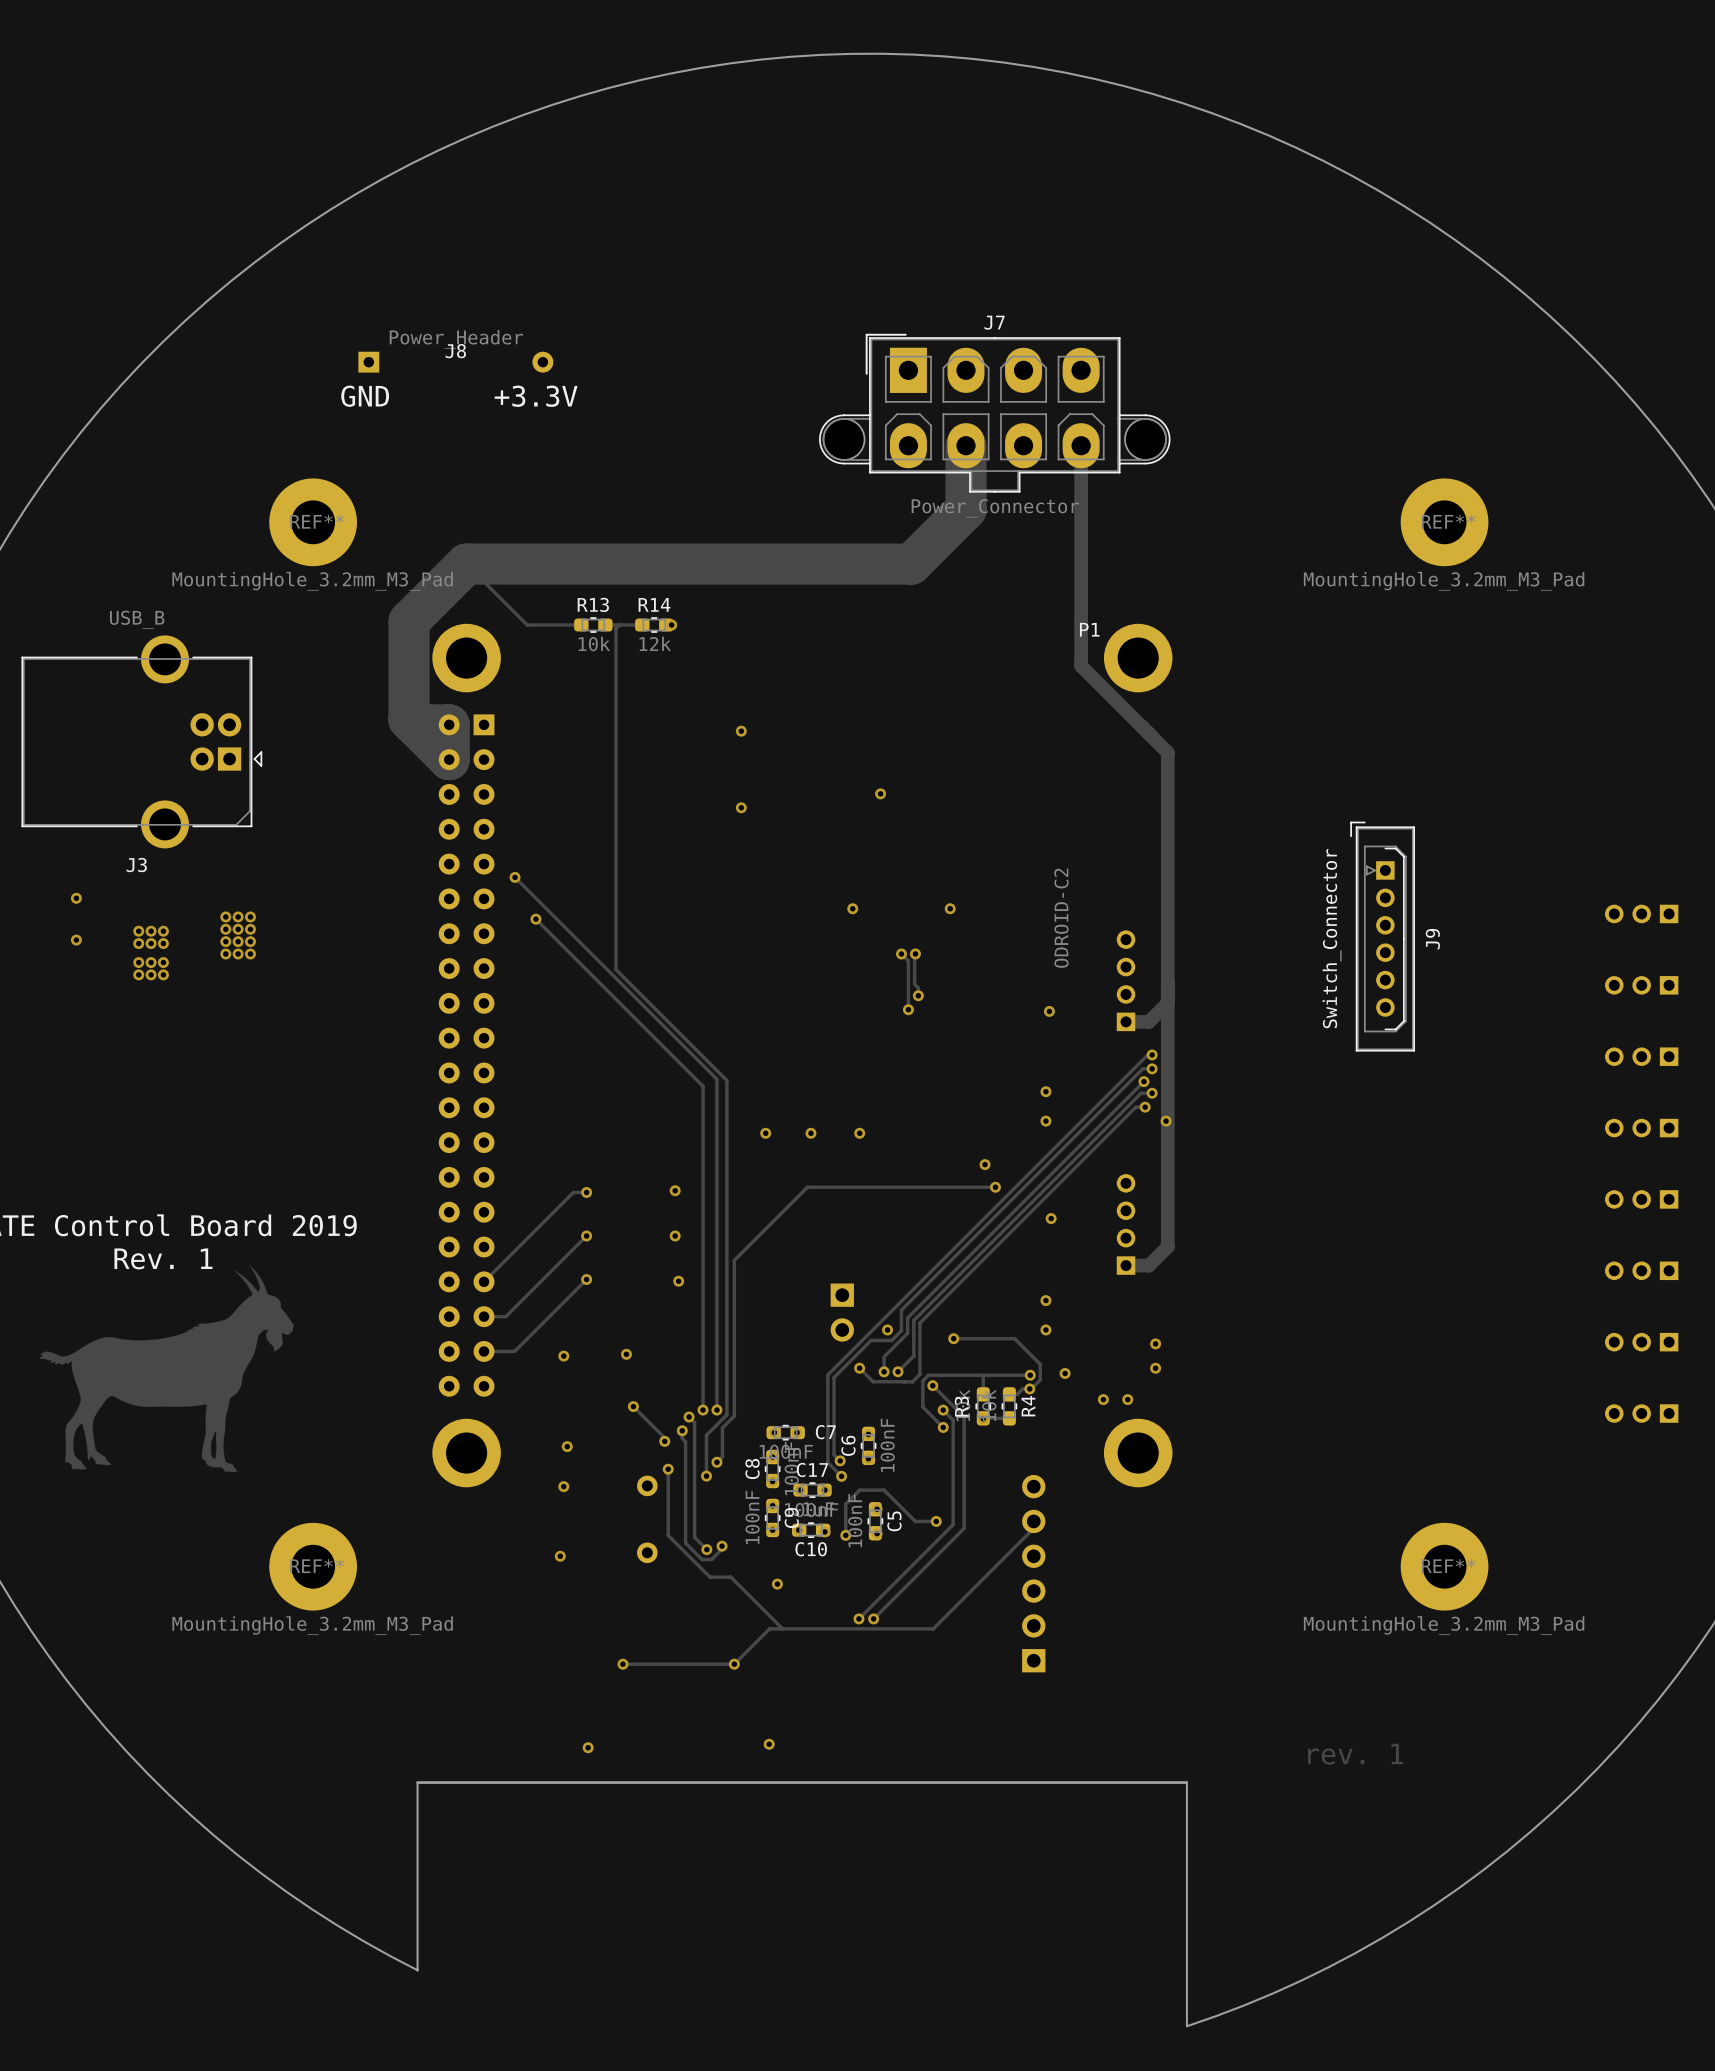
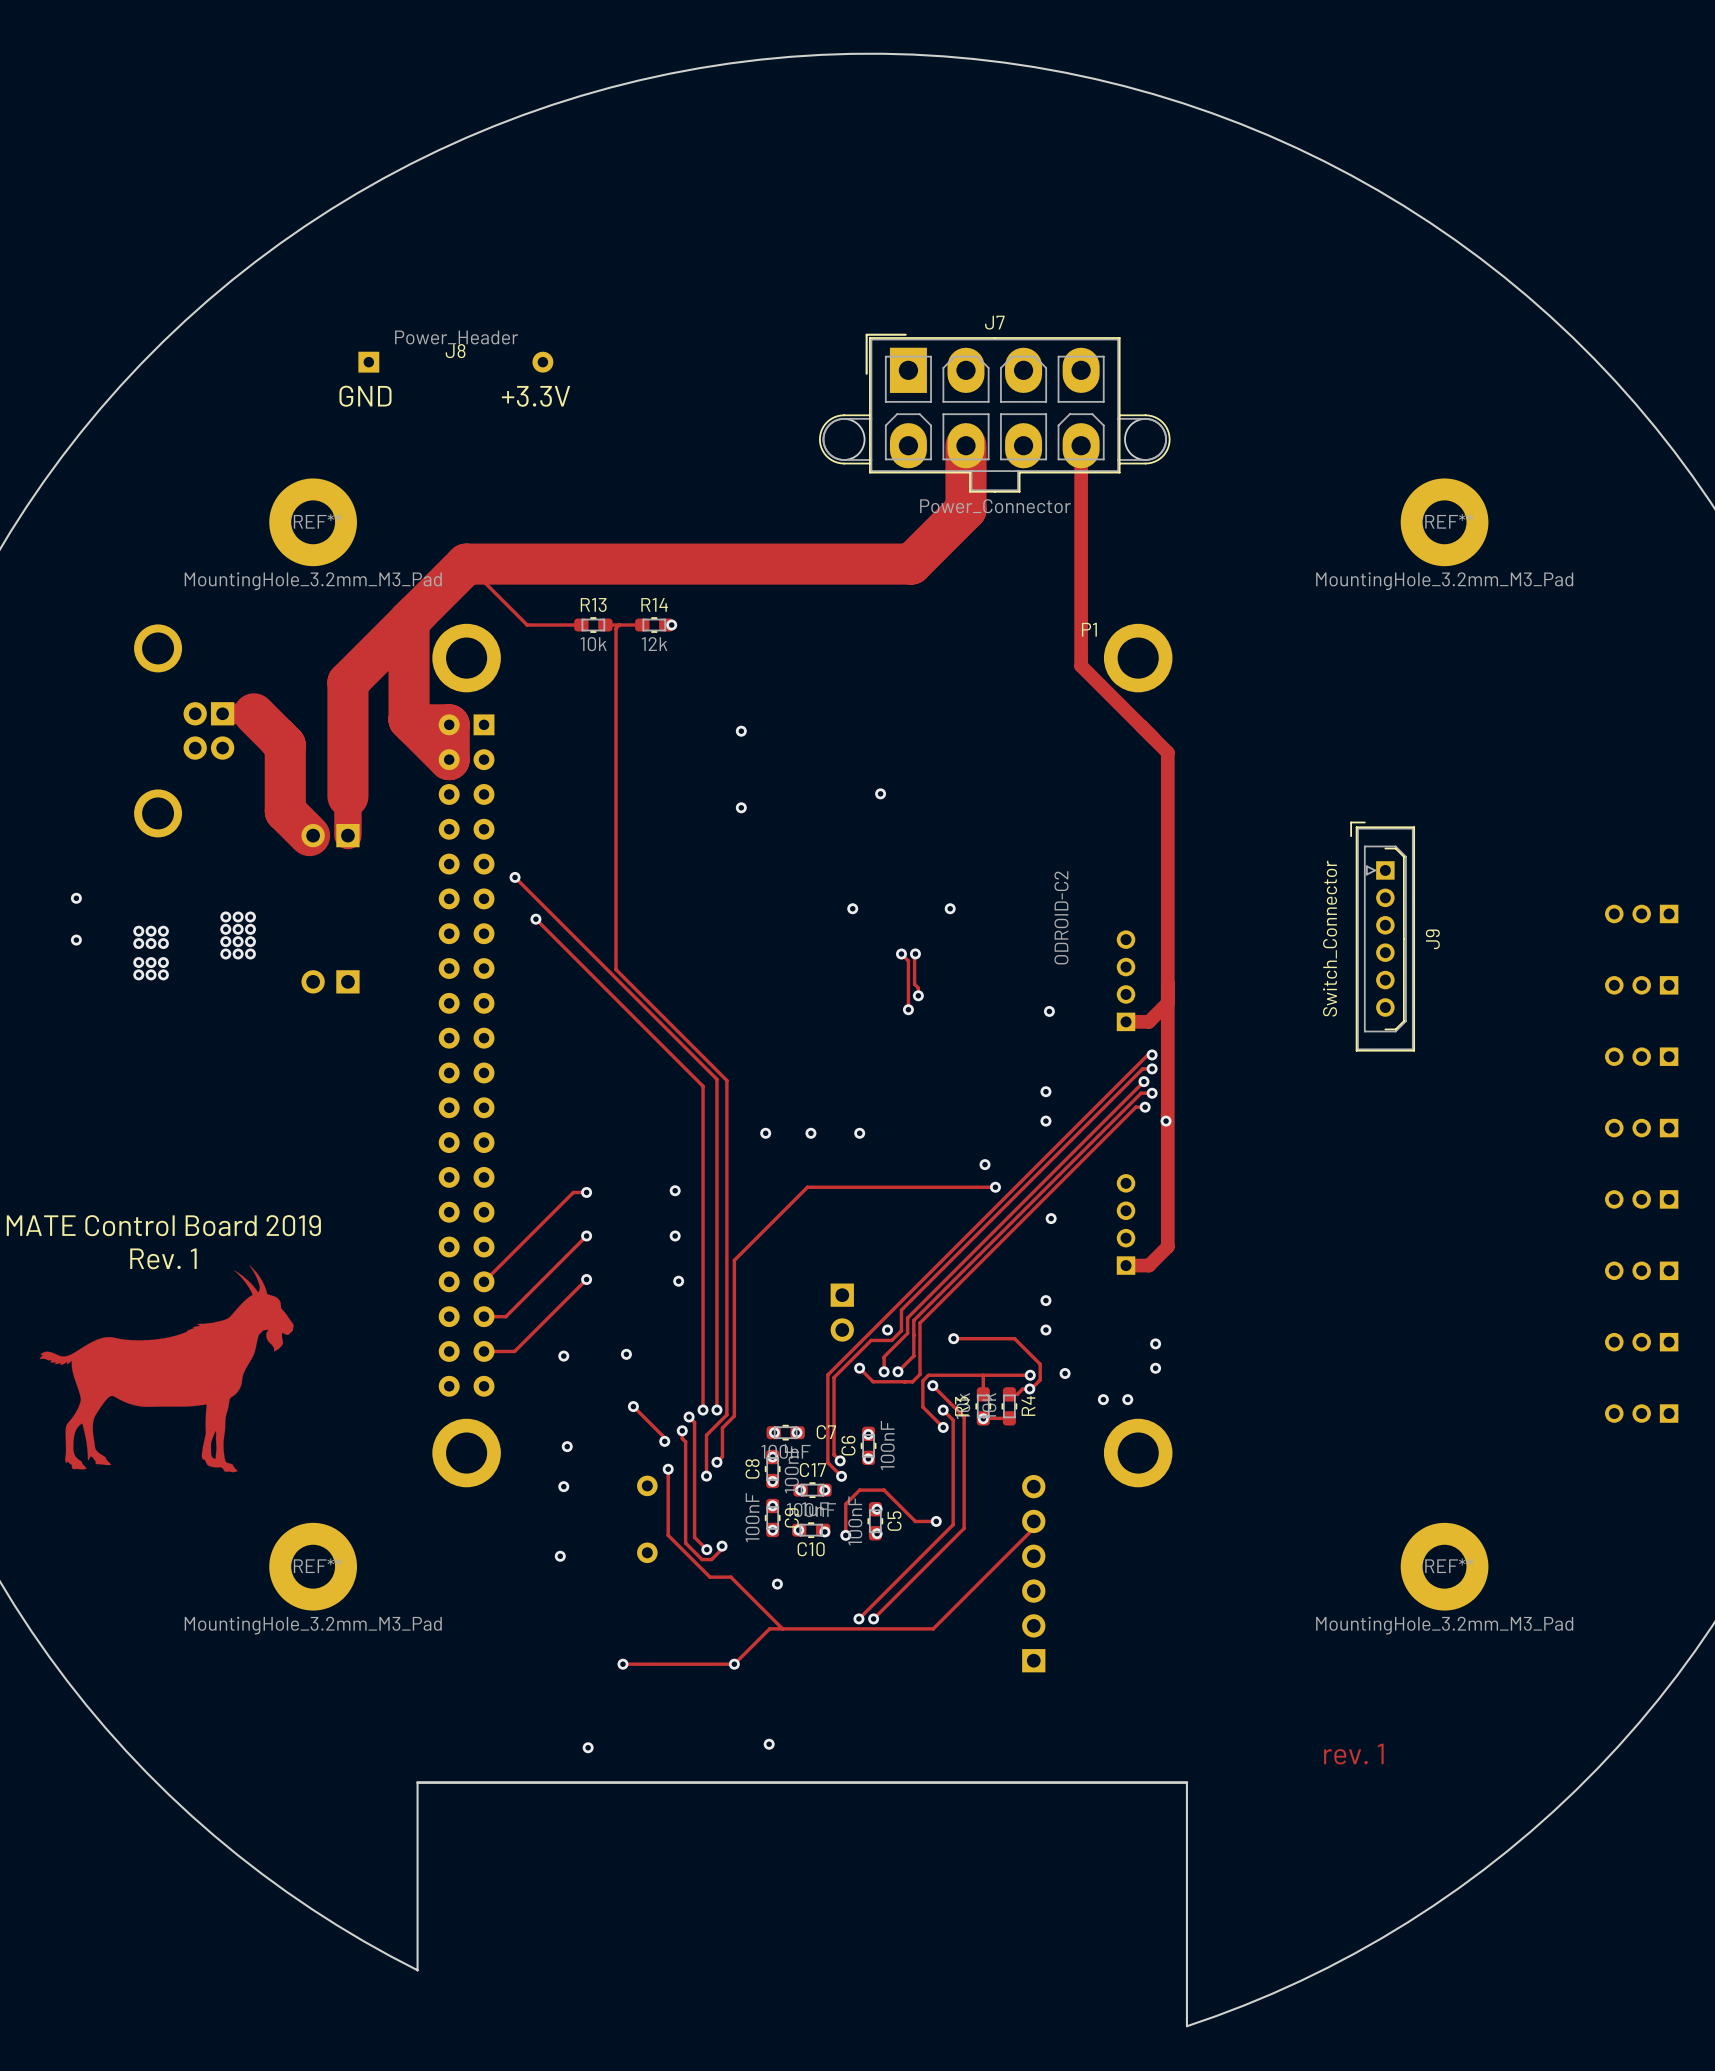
track: none -> (417, 612) (347, 682) (347, 835)
track: none -> (222, 713) (253, 713) (285, 745) (285, 811) (309, 835)
J3 side: top (141, 741) -> bottom (184, 730)
part: none -> (330, 835)
part: none -> (330, 981)

